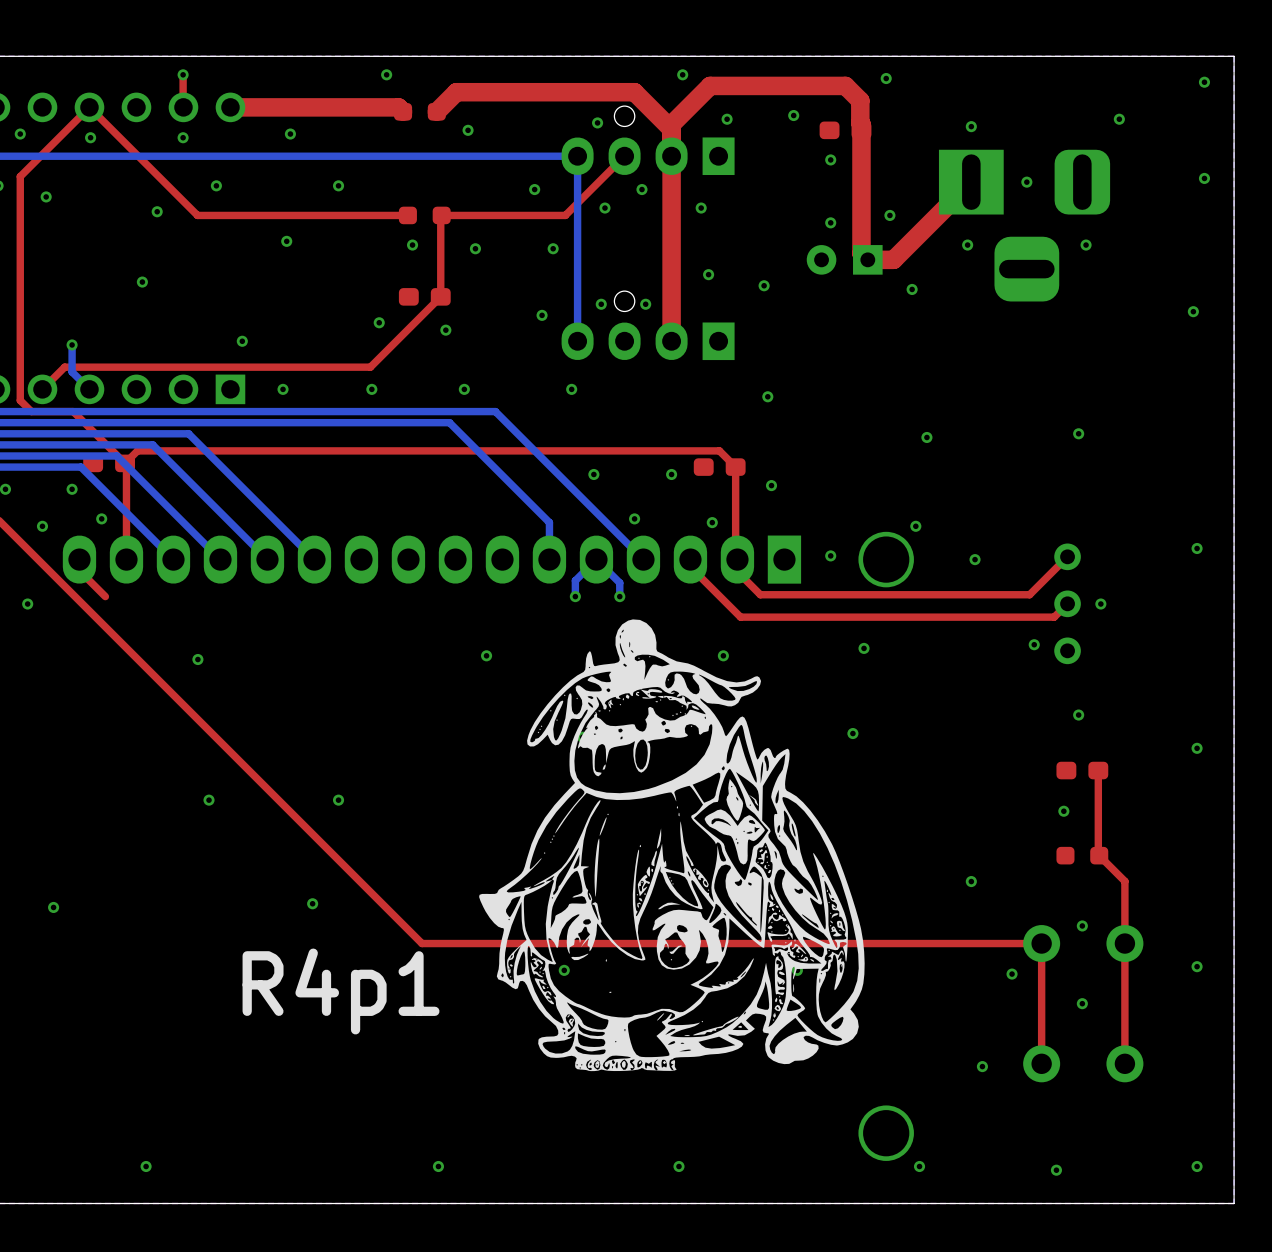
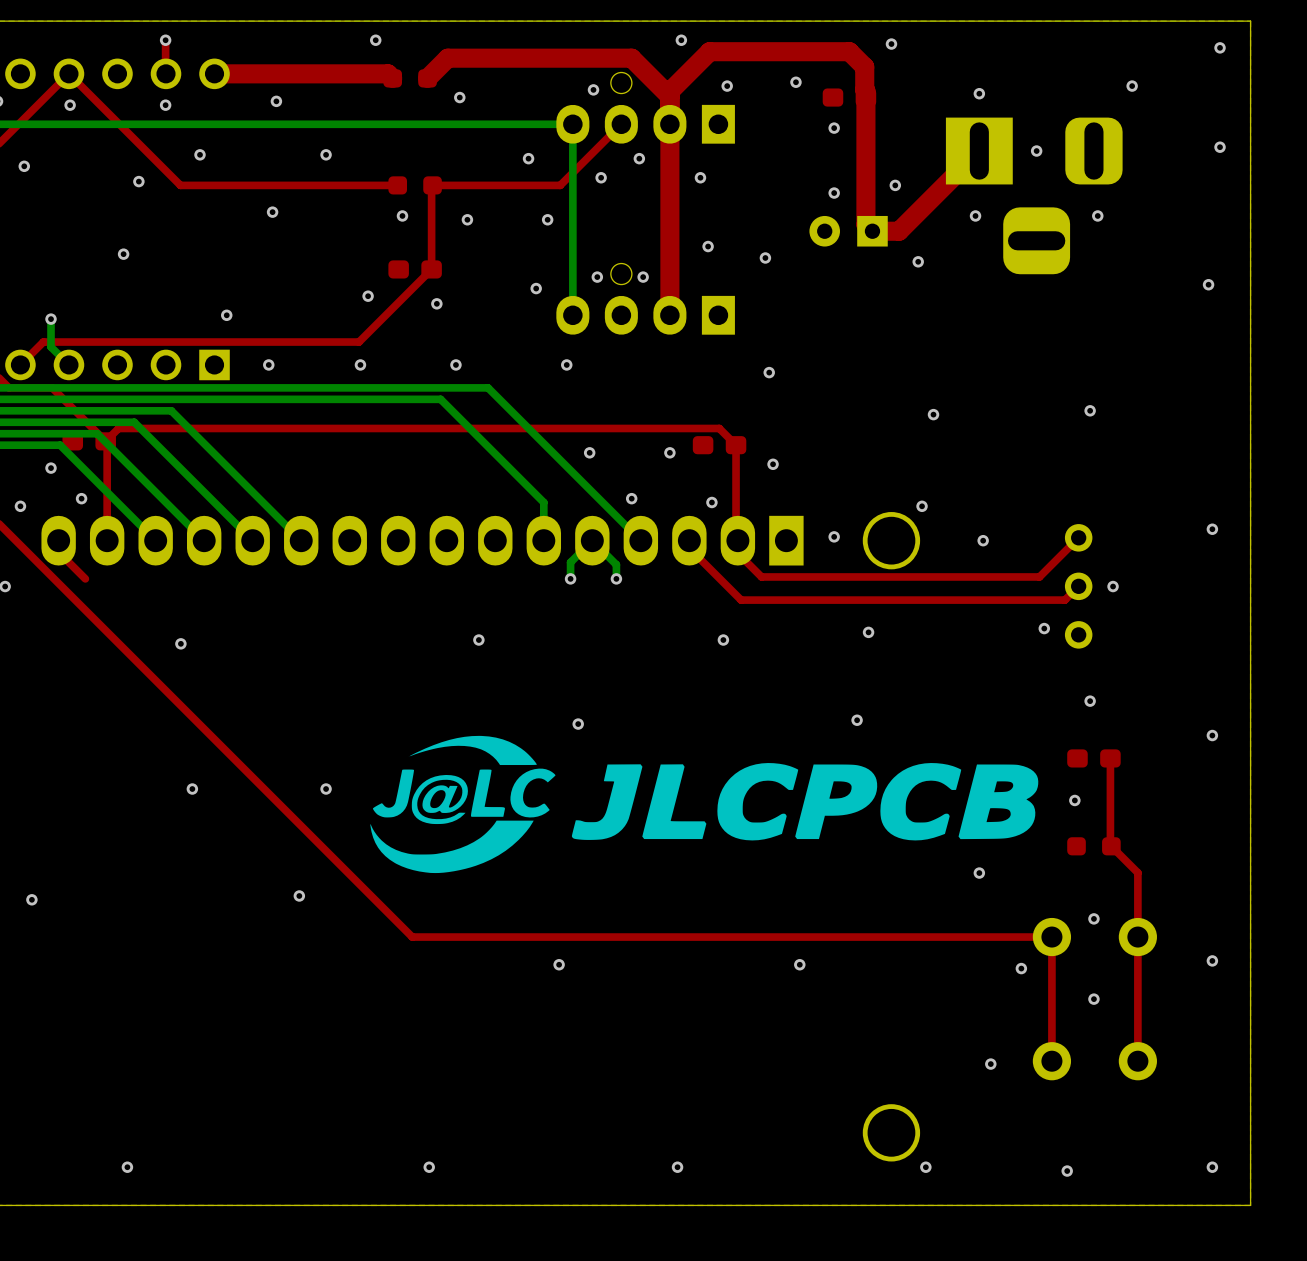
drawing: [479, 619, 865, 1072] -> none
drawing: none -> [370, 735, 1039, 874]
text: R4p1 (341, 991) -> none

